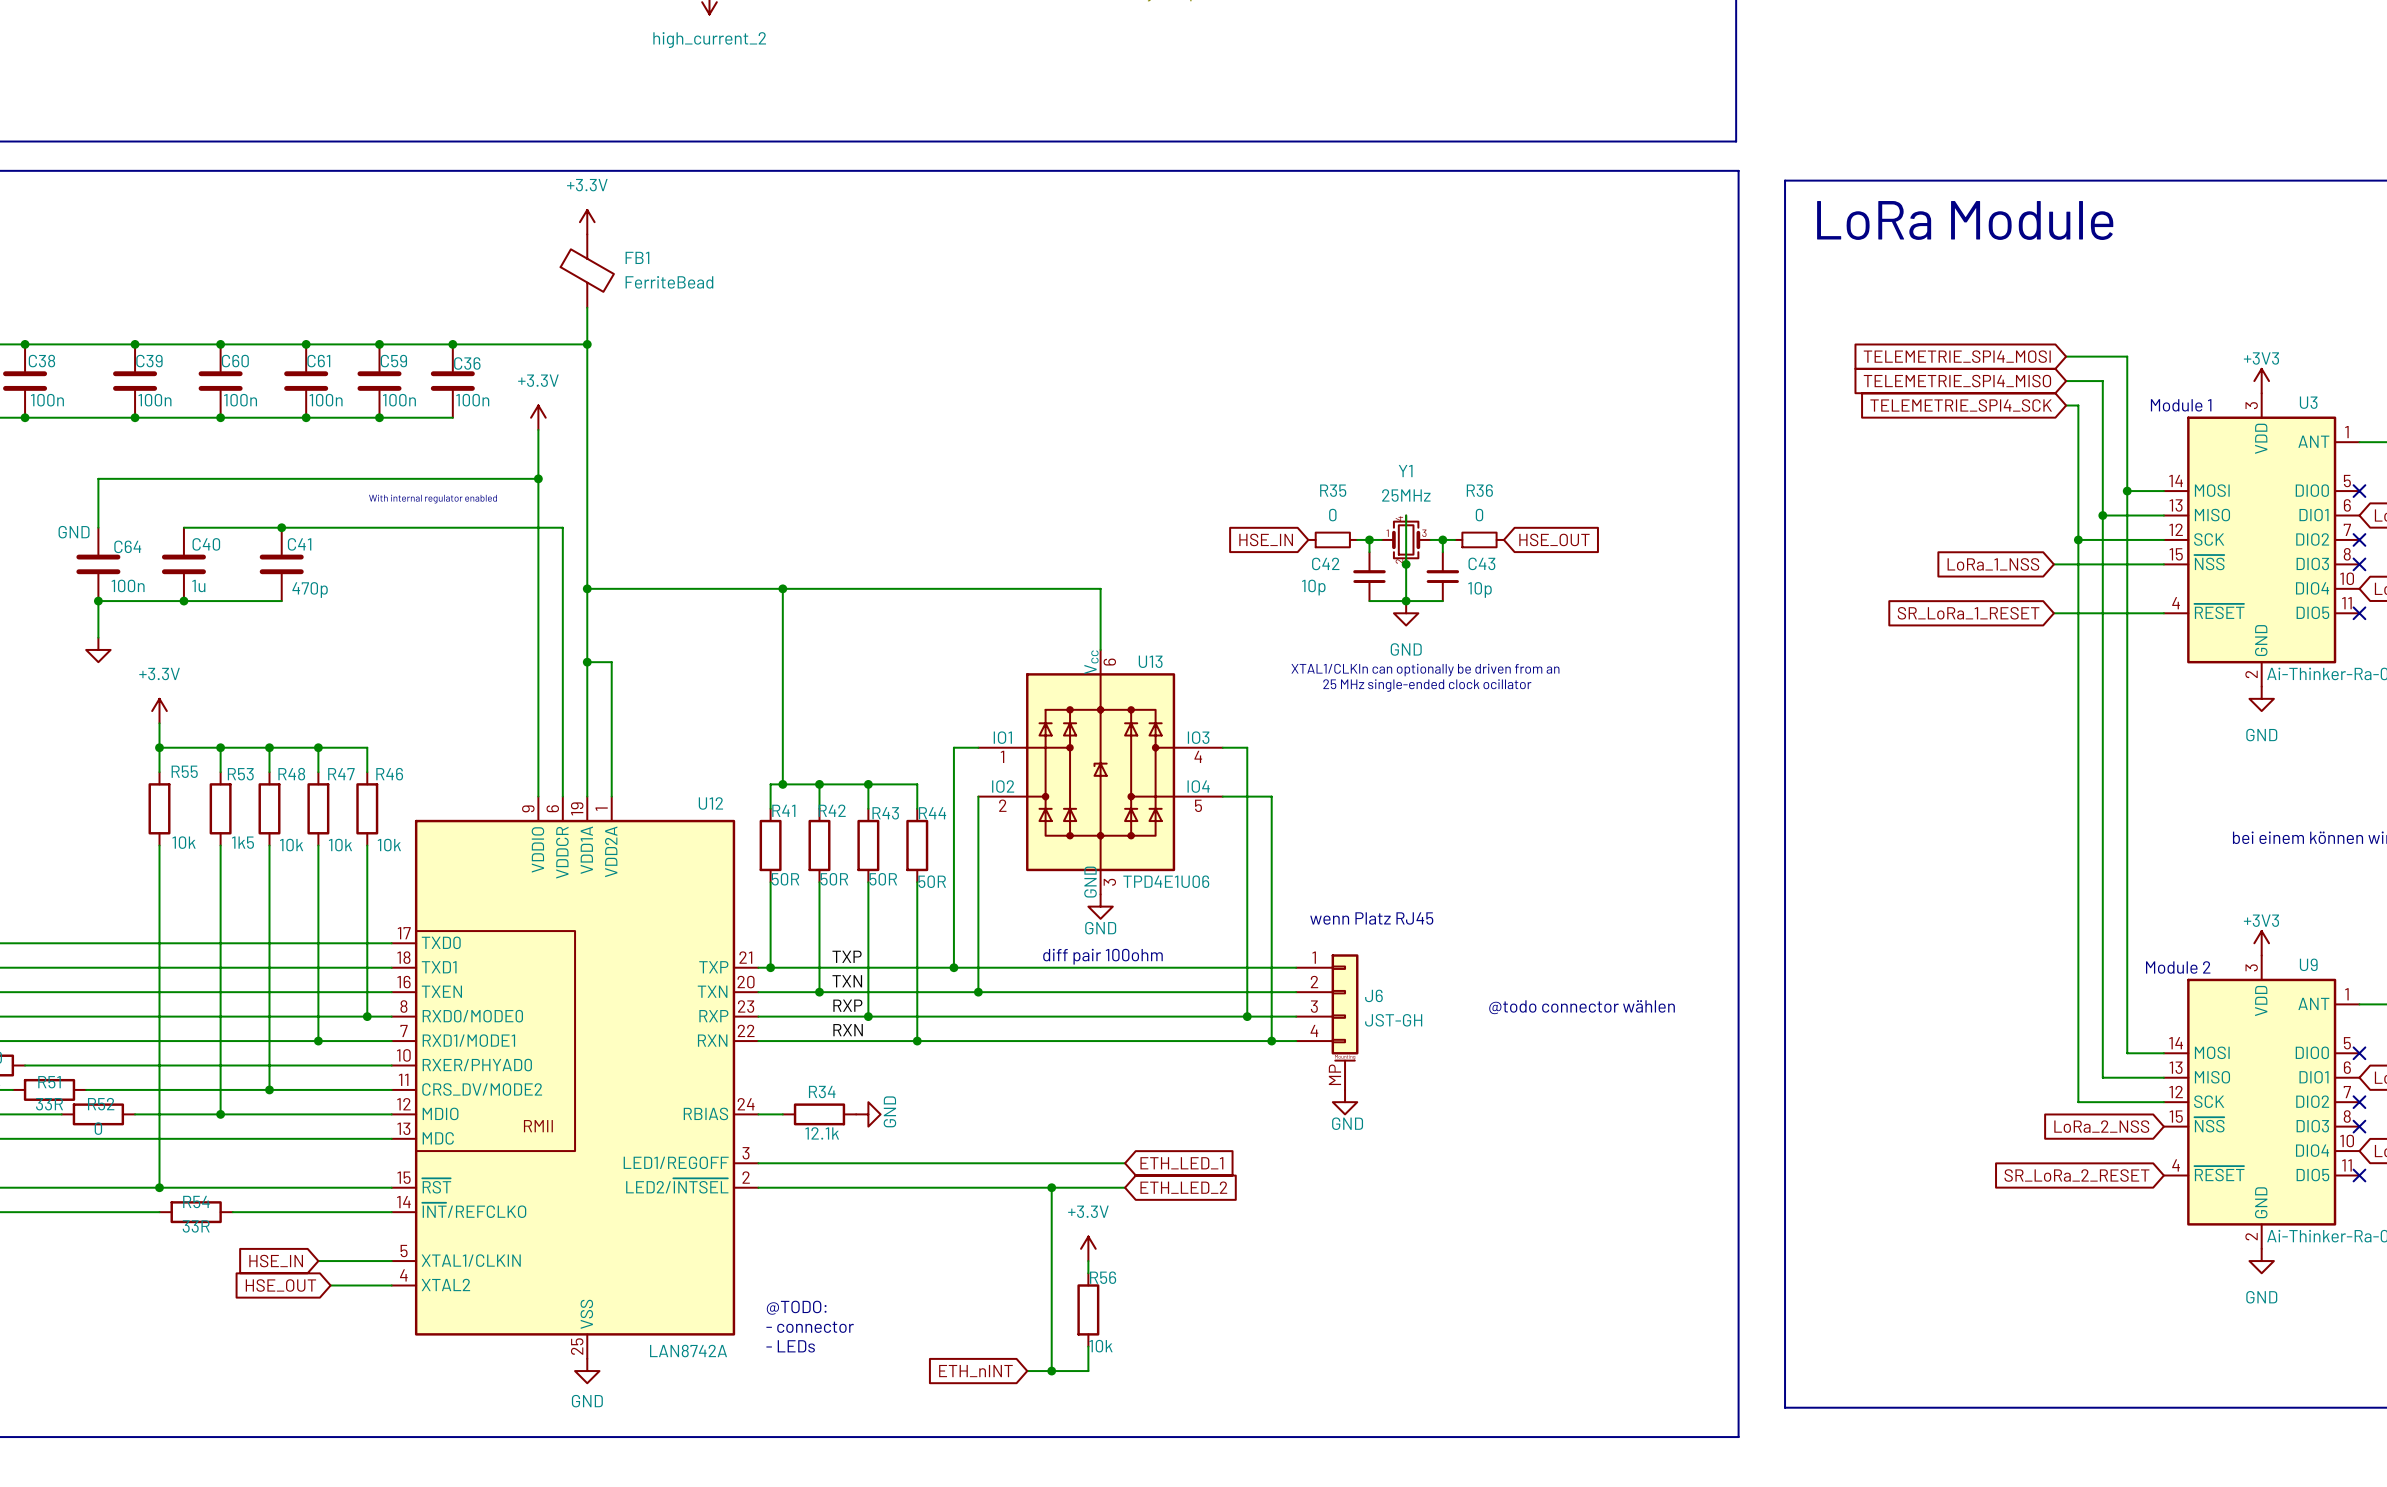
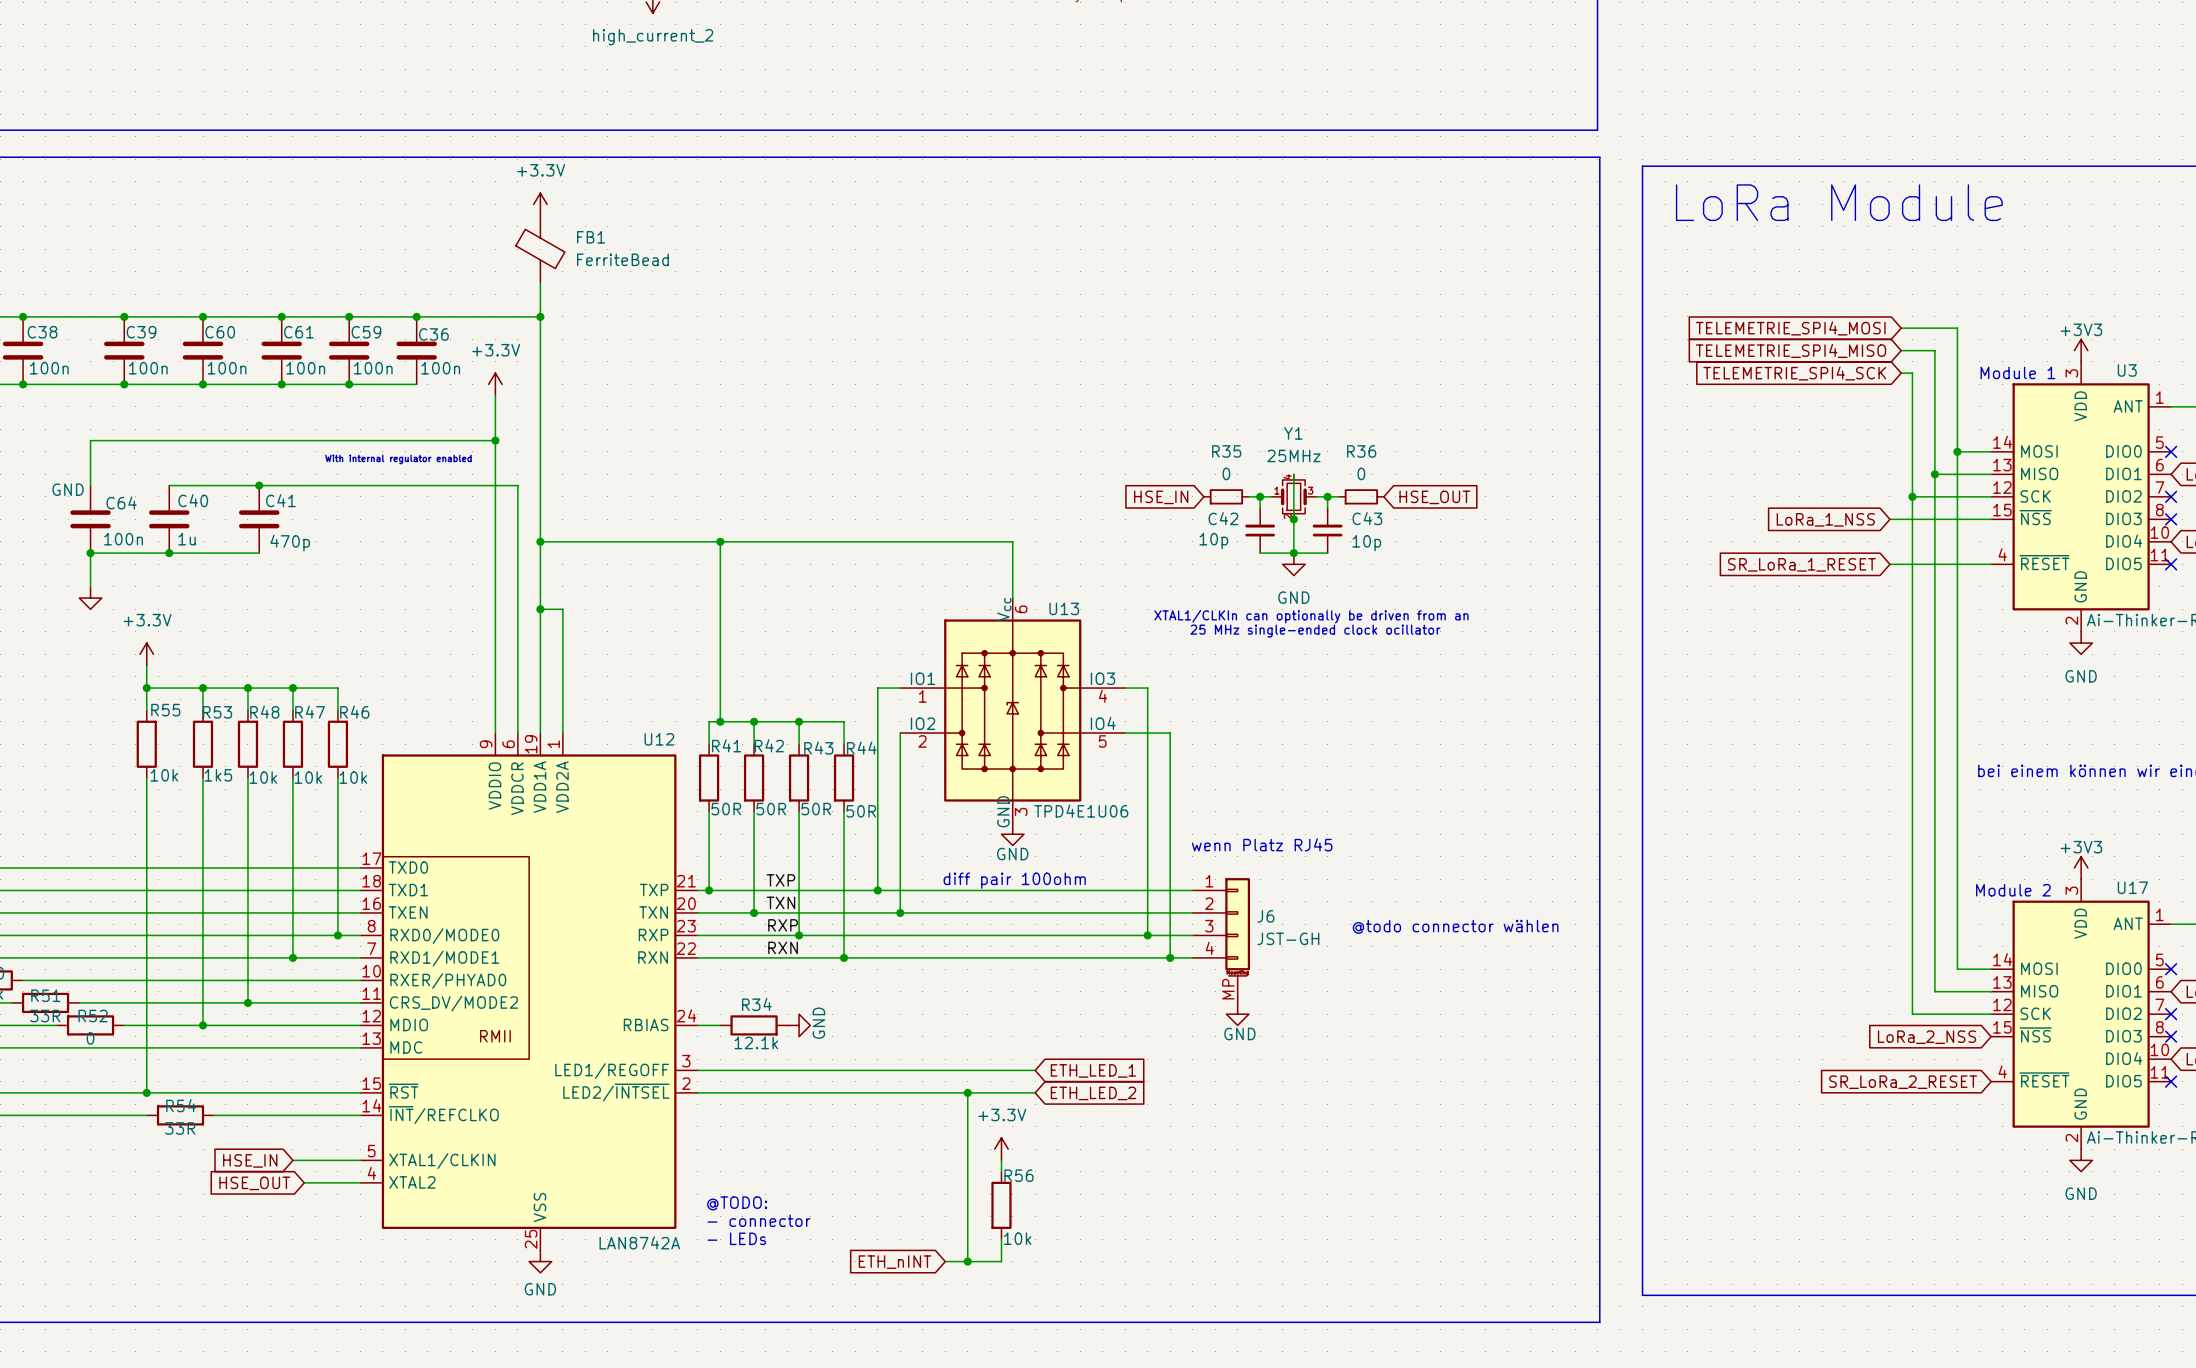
U9 name: U9 (2308, 964) -> U17 (2132, 887)

